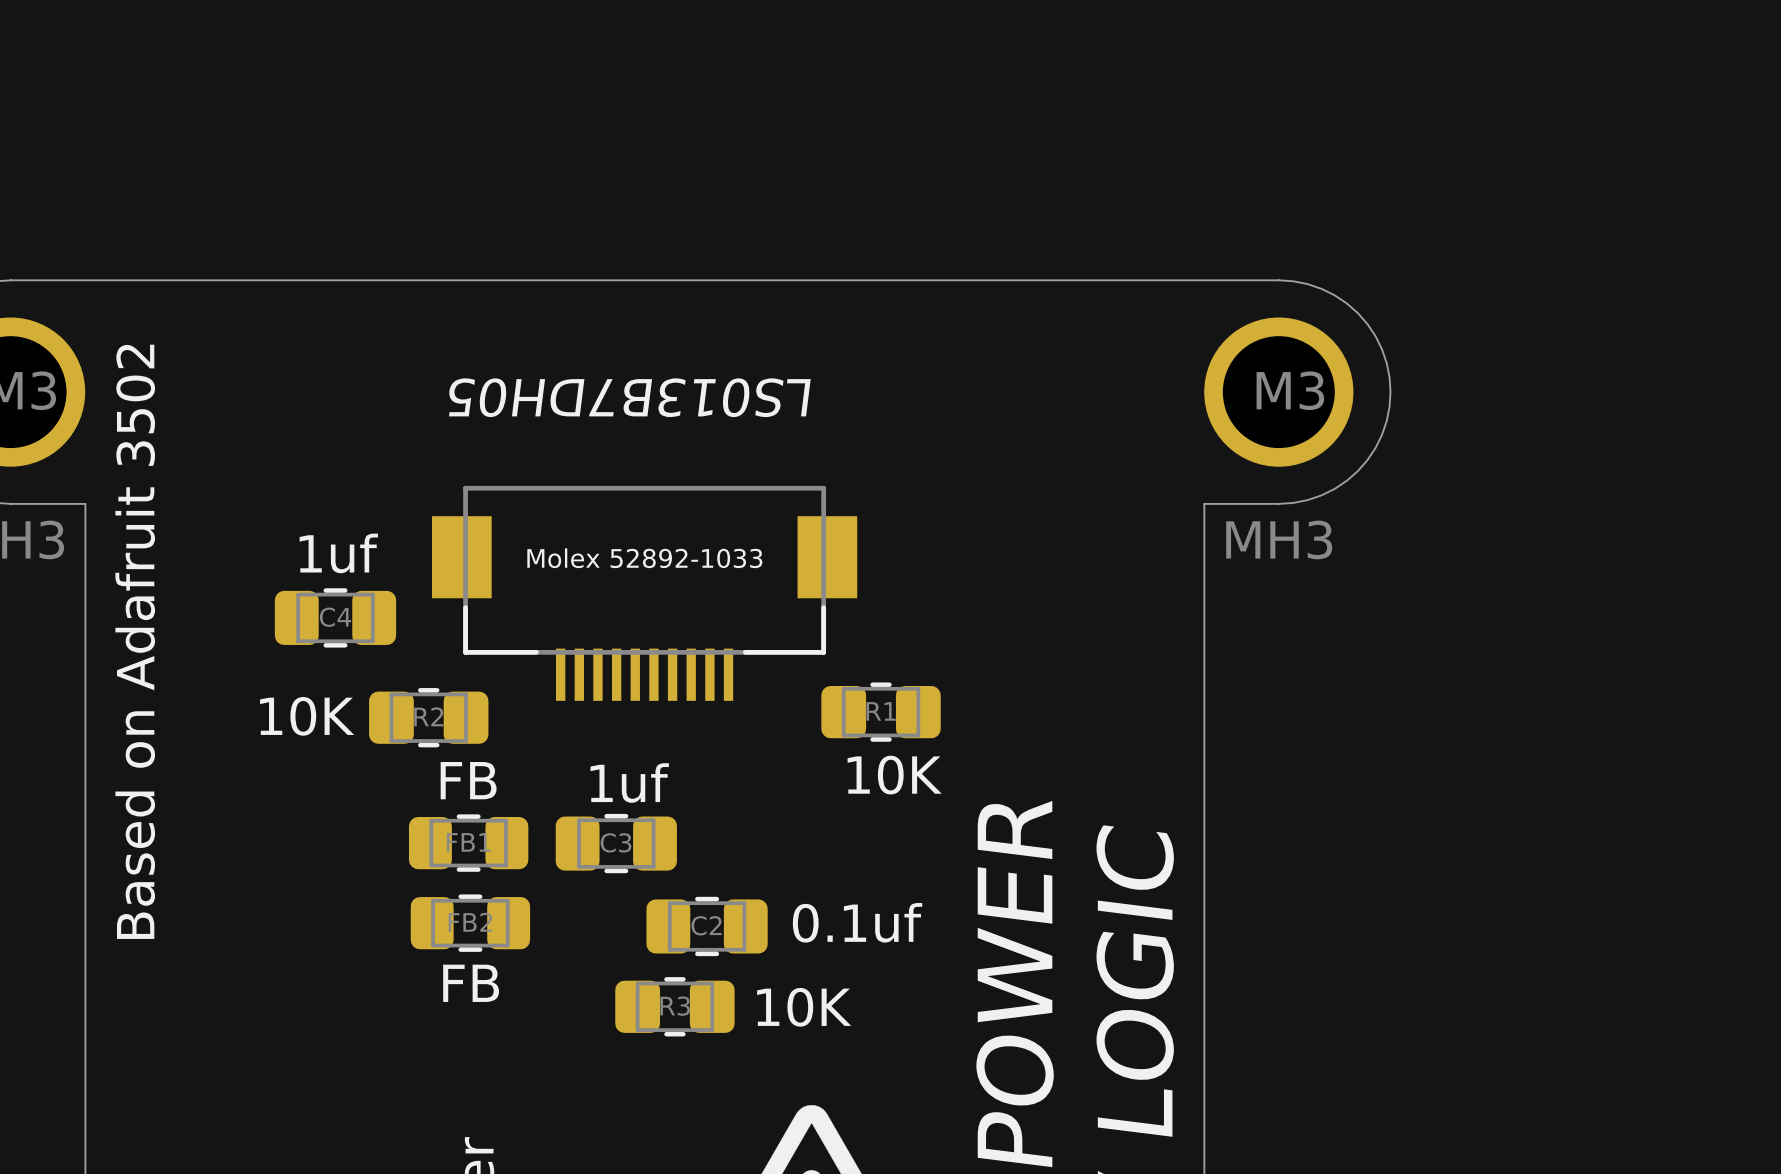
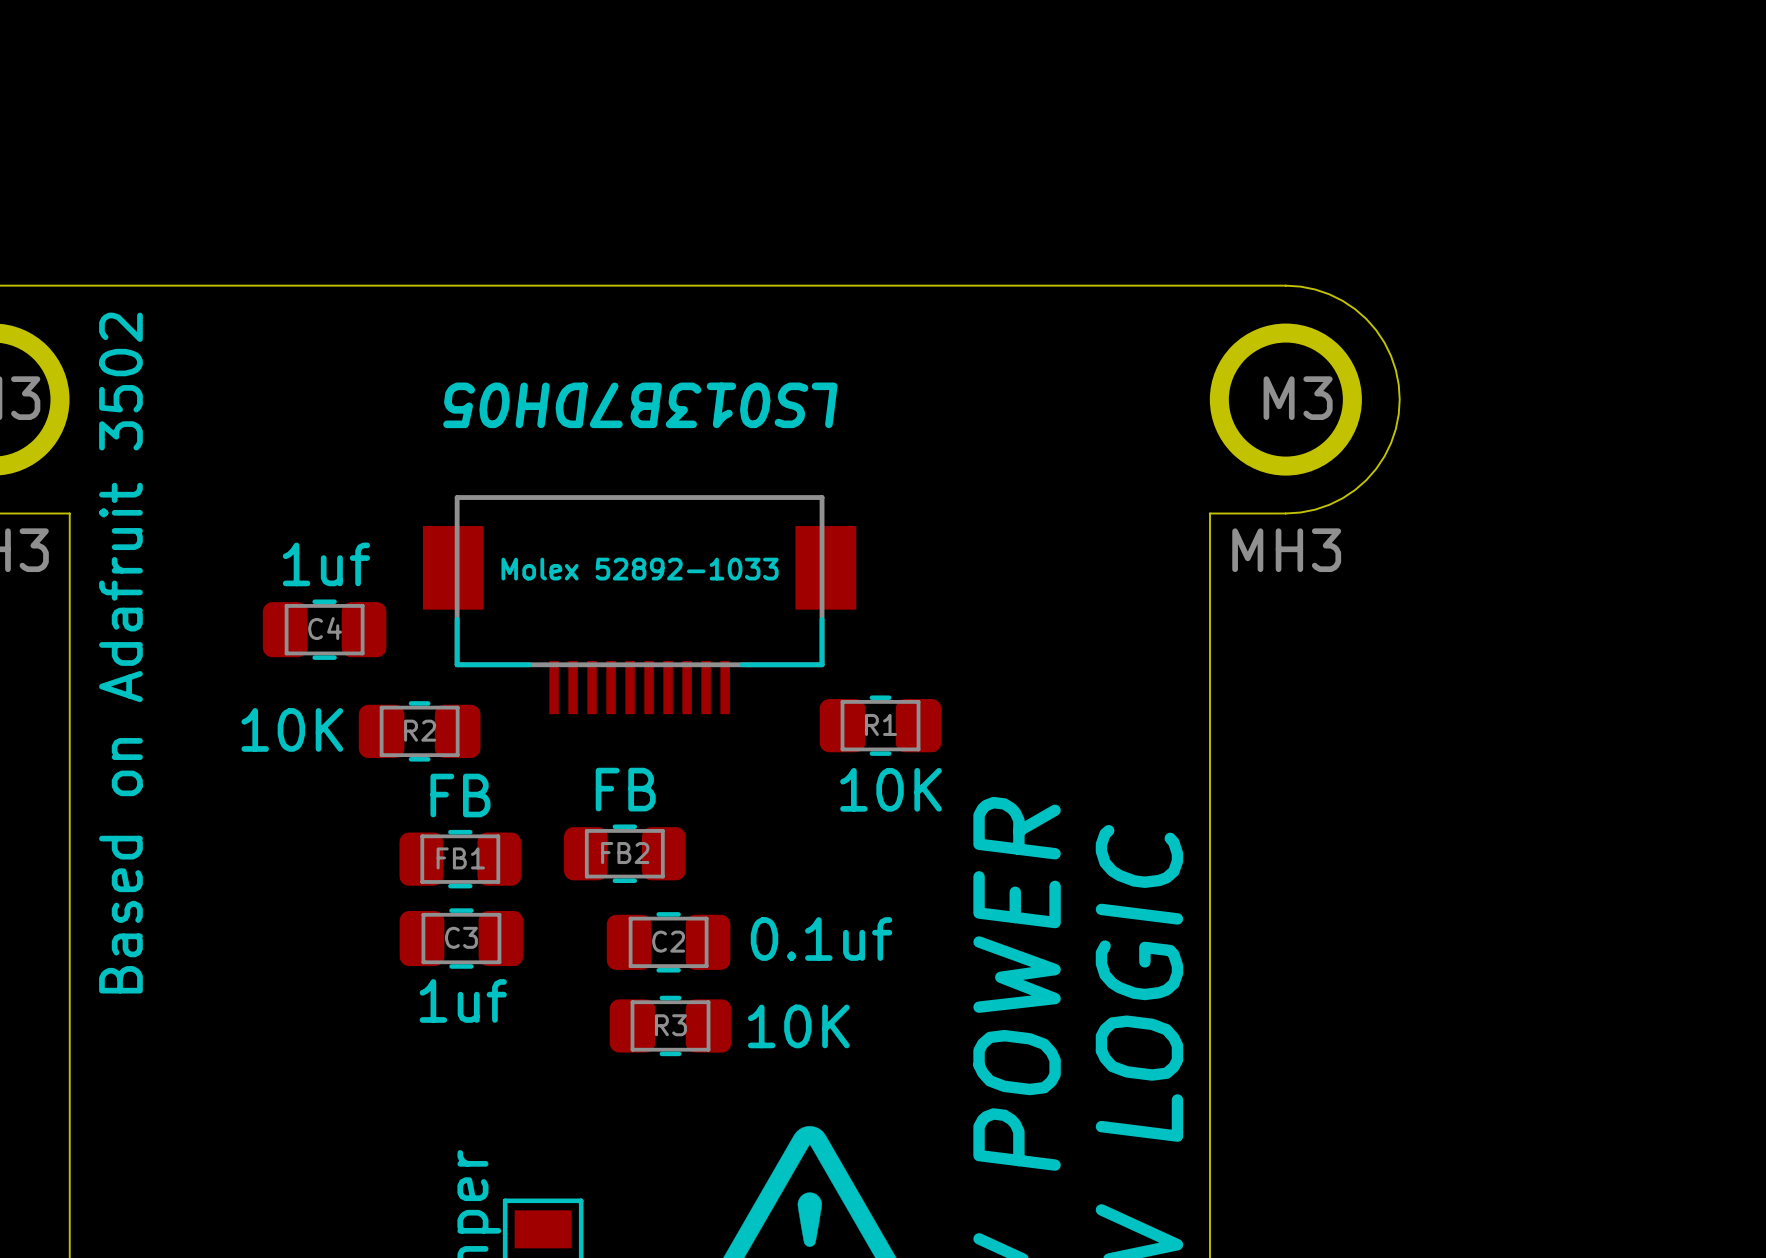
C3 value position: 1uf (629, 783) -> 1uf (463, 1000)
C3 position: (616, 843) -> (461, 938)
FB2 position: (470, 923) -> (624, 853)
C2 position: (707, 926) -> (668, 942)
FB2 value position: FB (471, 983) -> FB (625, 789)

